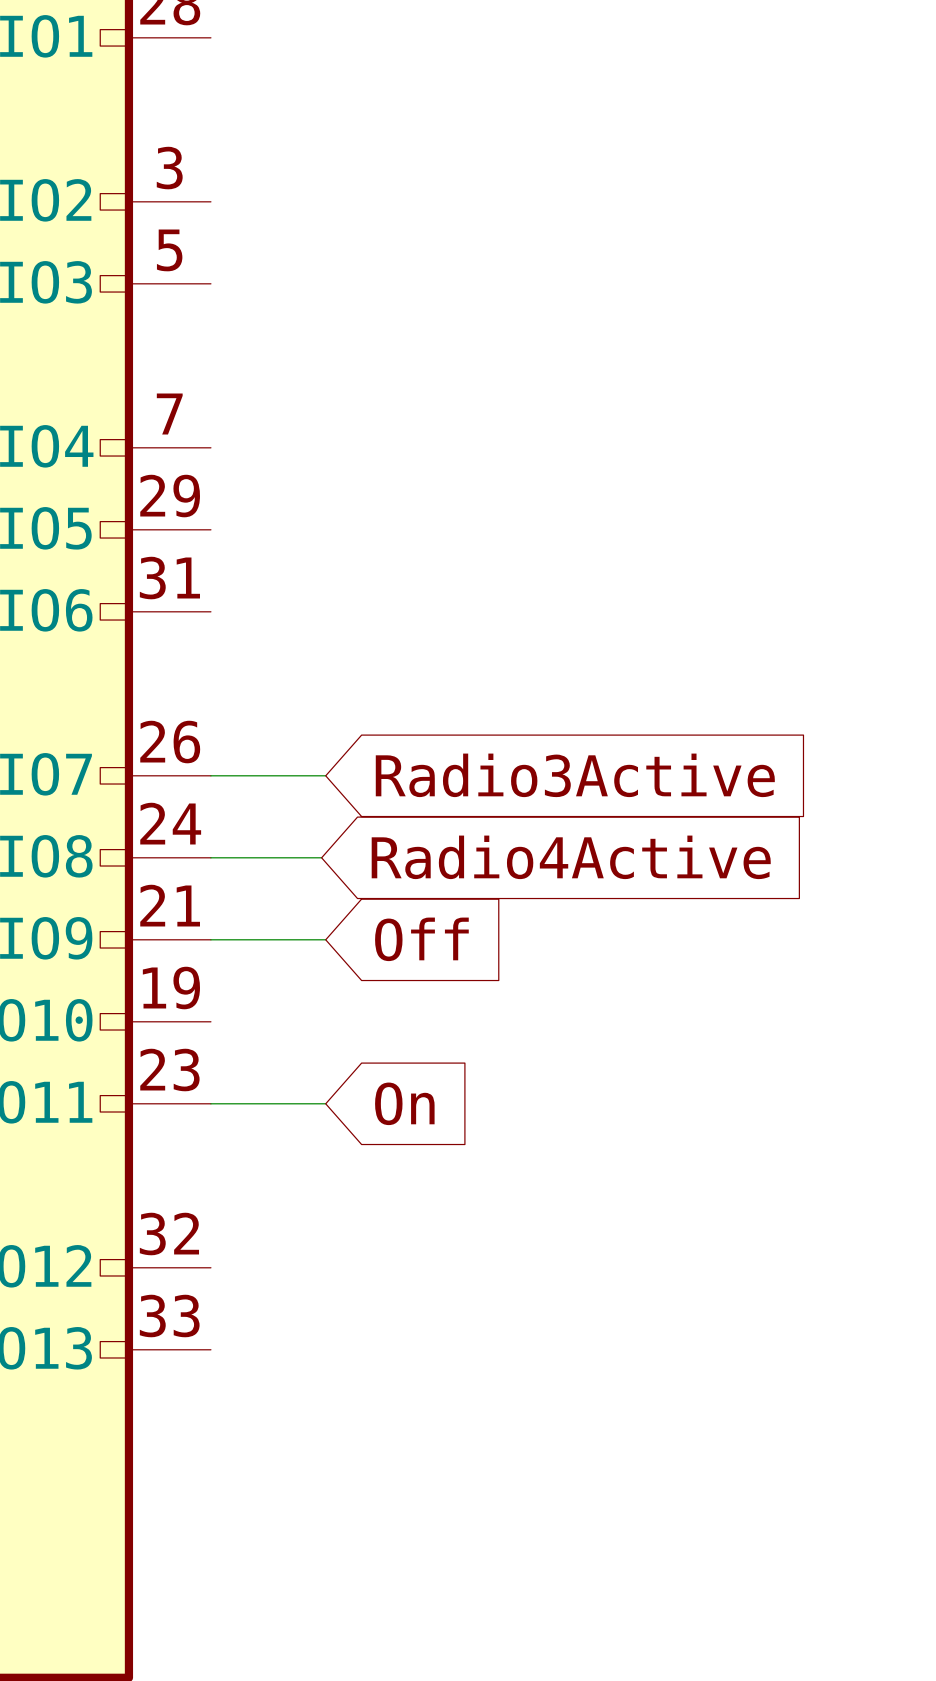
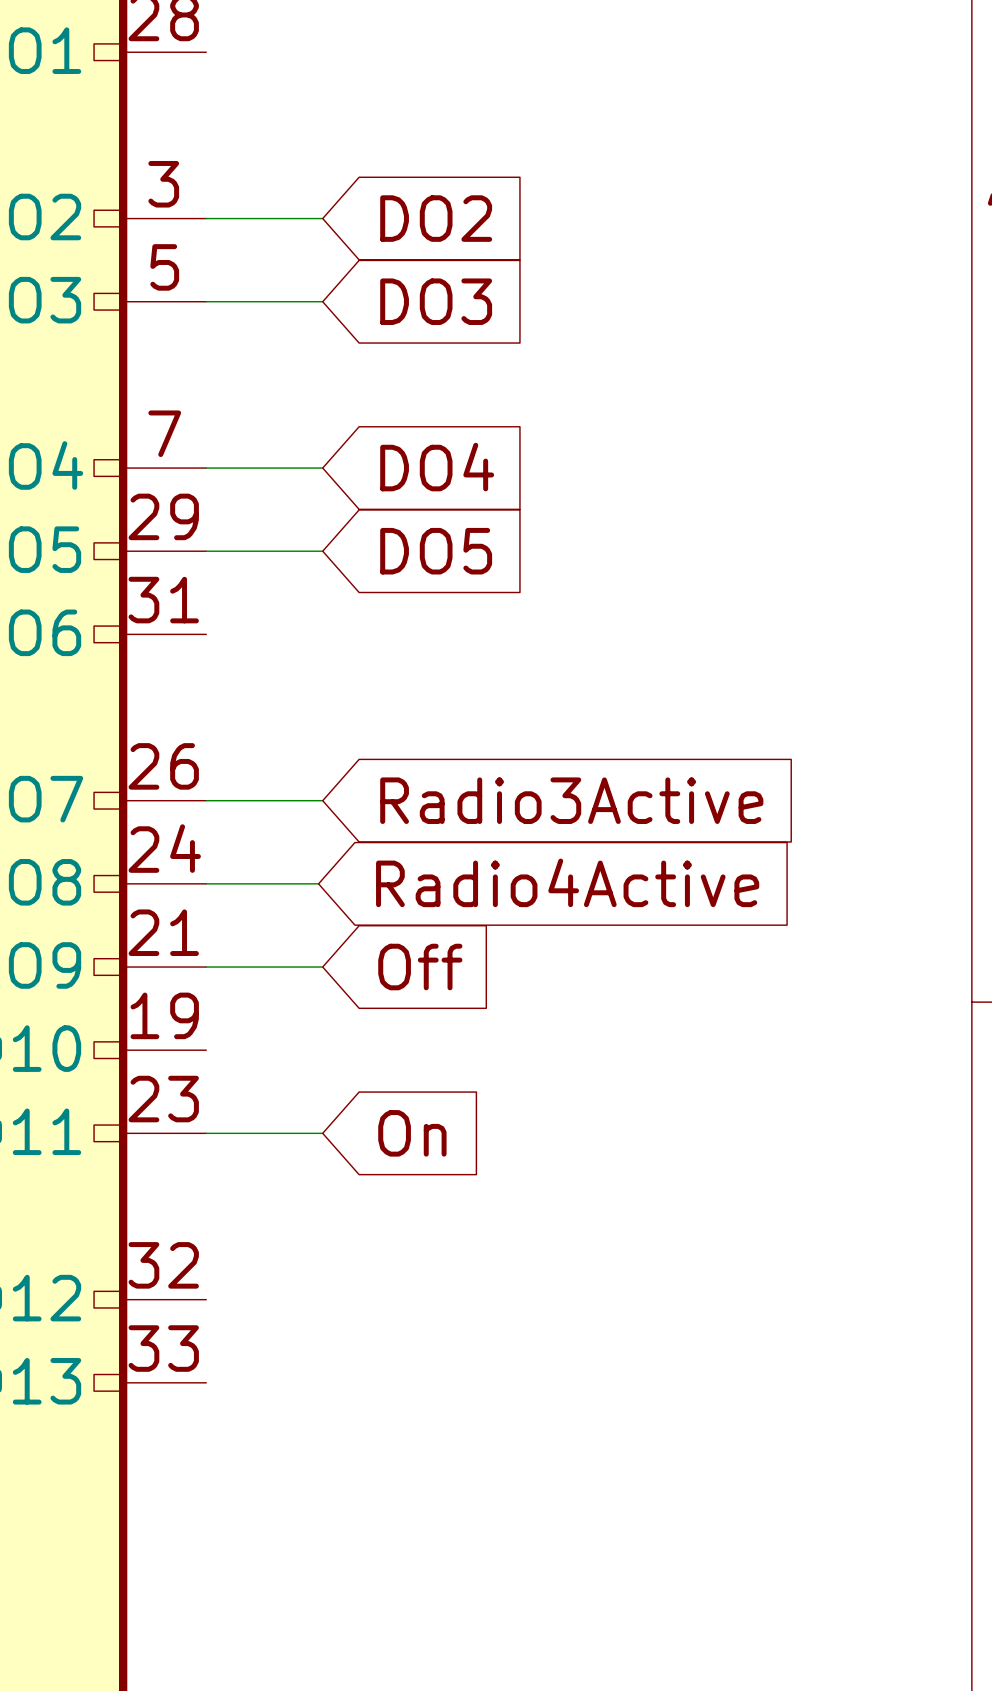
wire: none -> (206, 218) (322, 218)
global label: none -> DO2 (436, 218)
wire: none -> (206, 301) (322, 301)
global label: none -> DO3 (436, 301)
wire: none -> (206, 468) (322, 468)
global label: none -> DO4 (437, 467)
wire: none -> (206, 551) (322, 551)
global label: none -> DO5 (436, 551)

